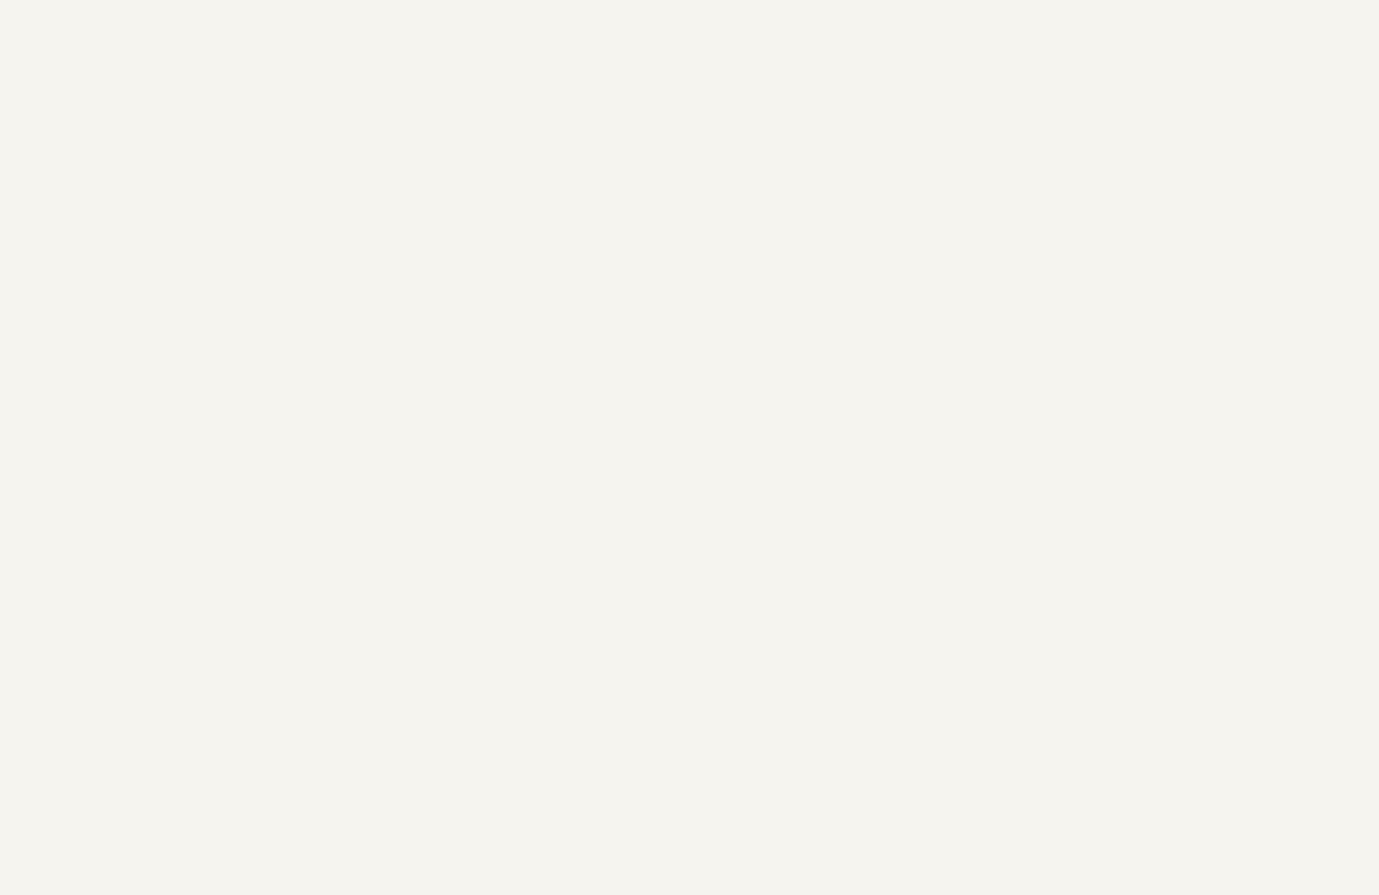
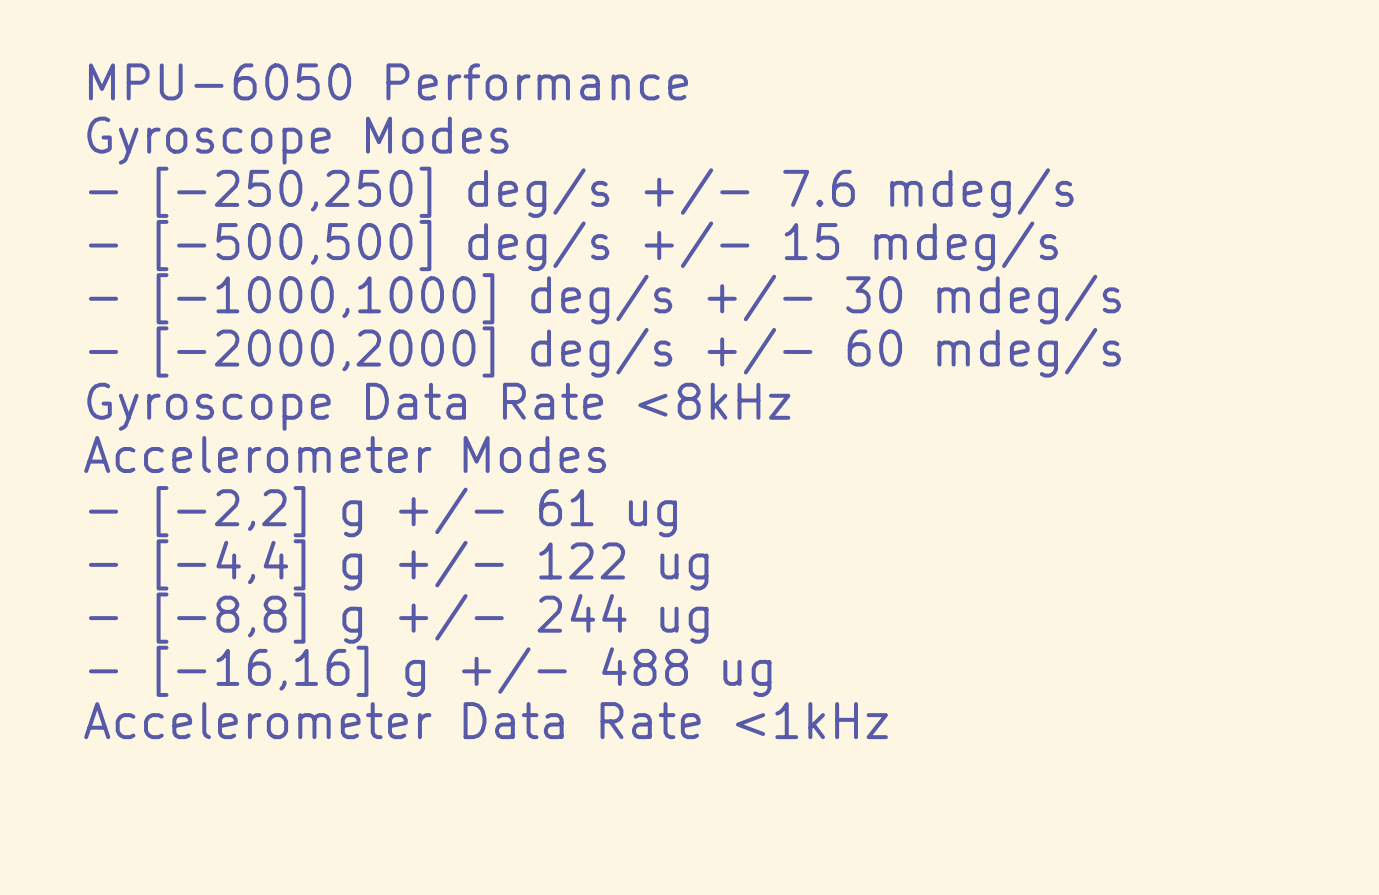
text: none -> MPU-6050 Performance (388, 81)
text: none -> Gyroscope Modes (297, 140)
text: none -> - [-250,250] deg/s +/- 7.6 mdeg/s (581, 192)
text: none -> - [-500,500] deg/s +/- 15 mdeg/s (573, 245)
text: none -> - [-1000,1000] deg/s +/- 30 mdeg/s (604, 298)
text: none -> - [-2000,2000] deg/s +/- 60 mdeg/s (604, 351)
text: none -> Gyroscope Data Rate <8kHz (438, 406)
text: none -> Accelerometer Modes (345, 454)
text: none -> - [-2,2] g +/- 61 ug (382, 511)
text: none -> - [-4,4] g +/- 122 ug (398, 564)
text: none -> - [-8,8] g +/- 244 ug (398, 618)
text: none -> - [-16,16] g +/- 488 ug (430, 671)
text: none -> Accelerometer Data Rate <1kHz (486, 720)

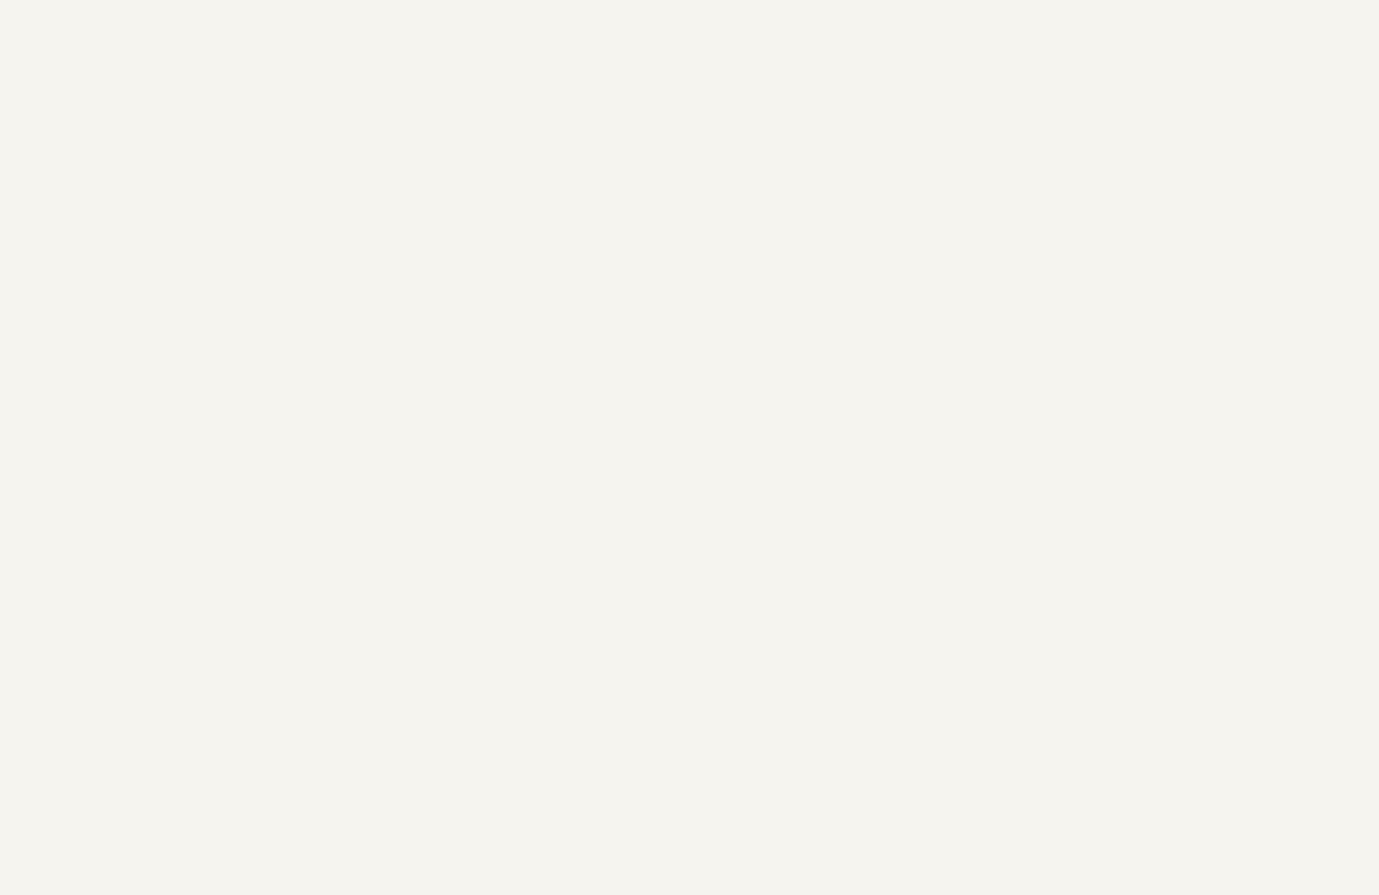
text: MPU-6050 Performance (388, 81) -> none
text: Gyroscope Modes (297, 140) -> none
text: - [-250,250] deg/s +/- 7.6 mdeg/s (581, 192) -> none
text: - [-500,500] deg/s +/- 15 mdeg/s (573, 245) -> none
text: - [-1000,1000] deg/s +/- 30 mdeg/s (604, 298) -> none
text: - [-2000,2000] deg/s +/- 60 mdeg/s (604, 351) -> none
text: Gyroscope Data Rate <8kHz (438, 406) -> none
text: Accelerometer Modes (345, 454) -> none
text: - [-2,2] g +/- 61 ug (382, 511) -> none
text: - [-4,4] g +/- 122 ug (398, 564) -> none
text: - [-8,8] g +/- 244 ug (398, 618) -> none
text: - [-16,16] g +/- 488 ug (430, 671) -> none
text: Accelerometer Data Rate <1kHz (486, 720) -> none

